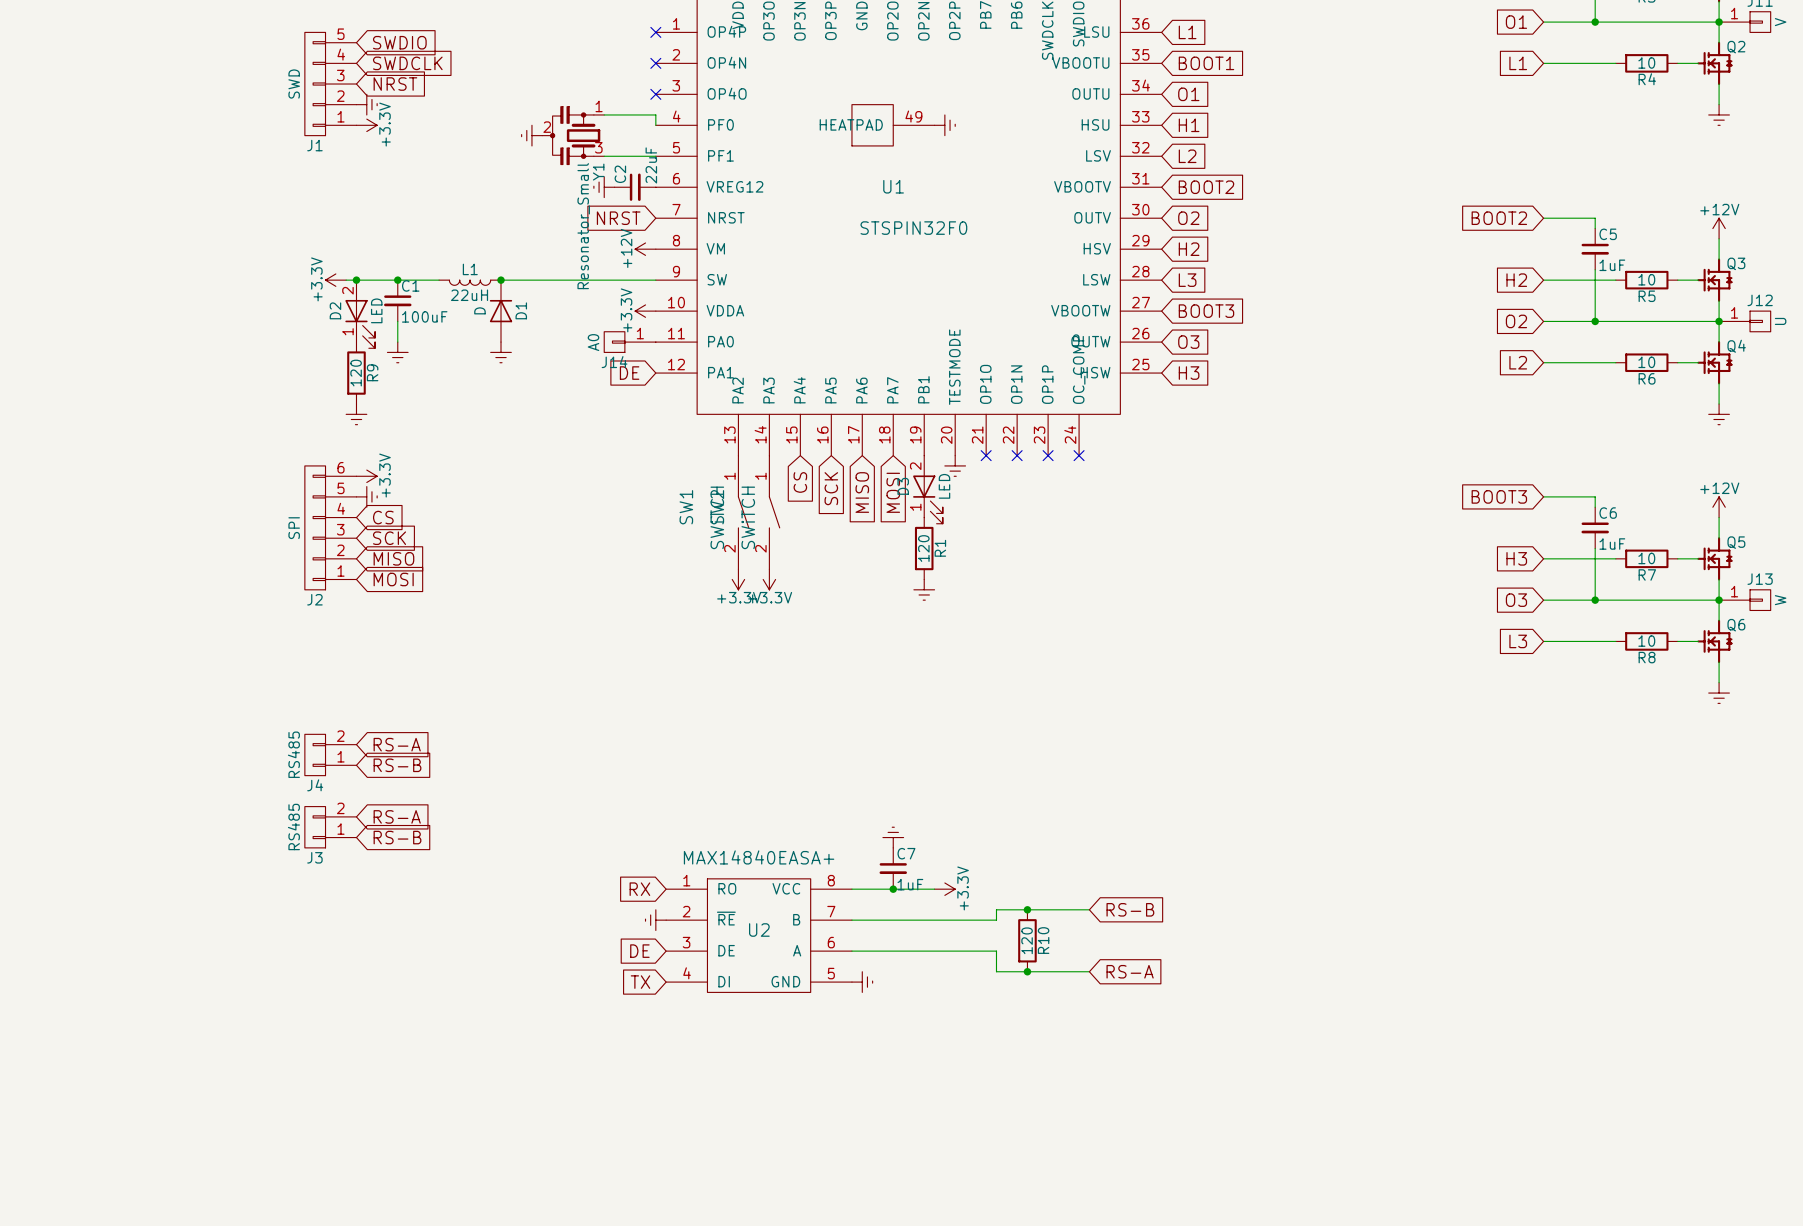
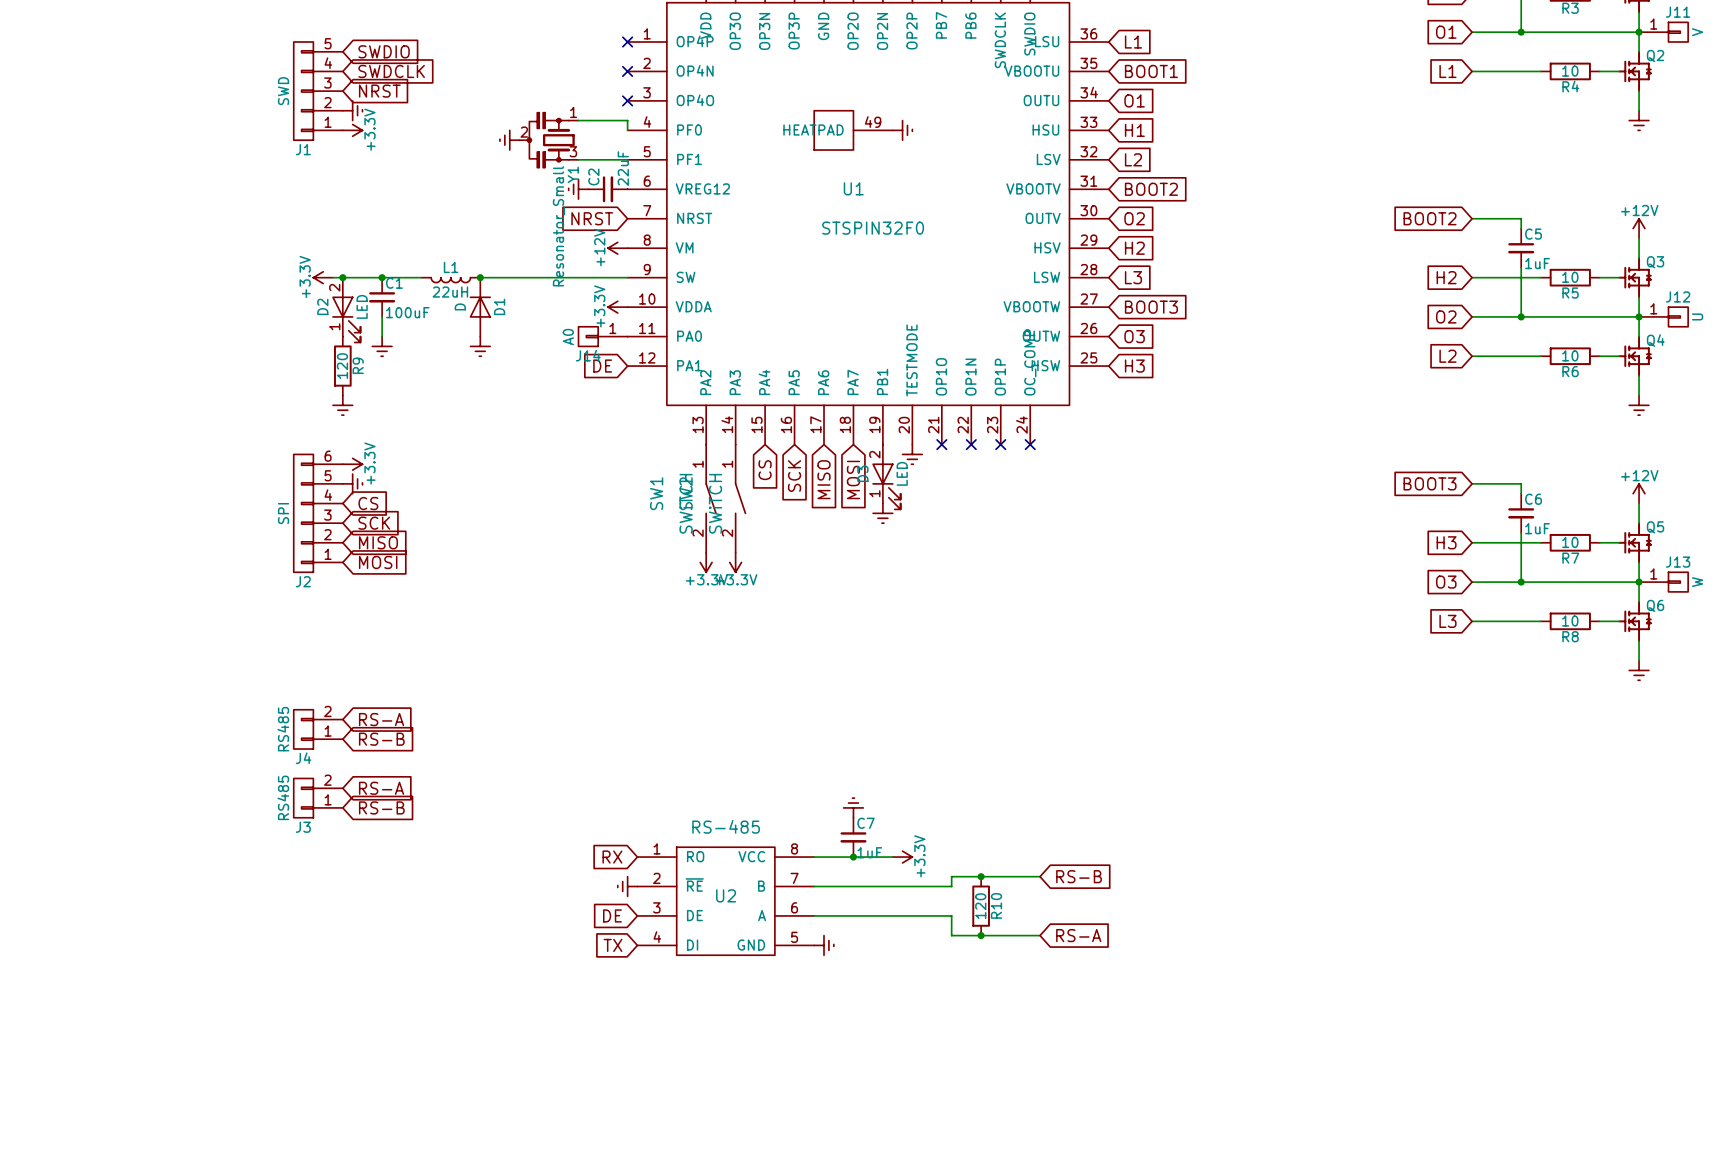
R1: 120 (924, 548) -> none
power symbol position: (924, 589) -> (882, 513)
U2 value: MAX14840EASA+ (759, 857) -> RS-485 (726, 826)

